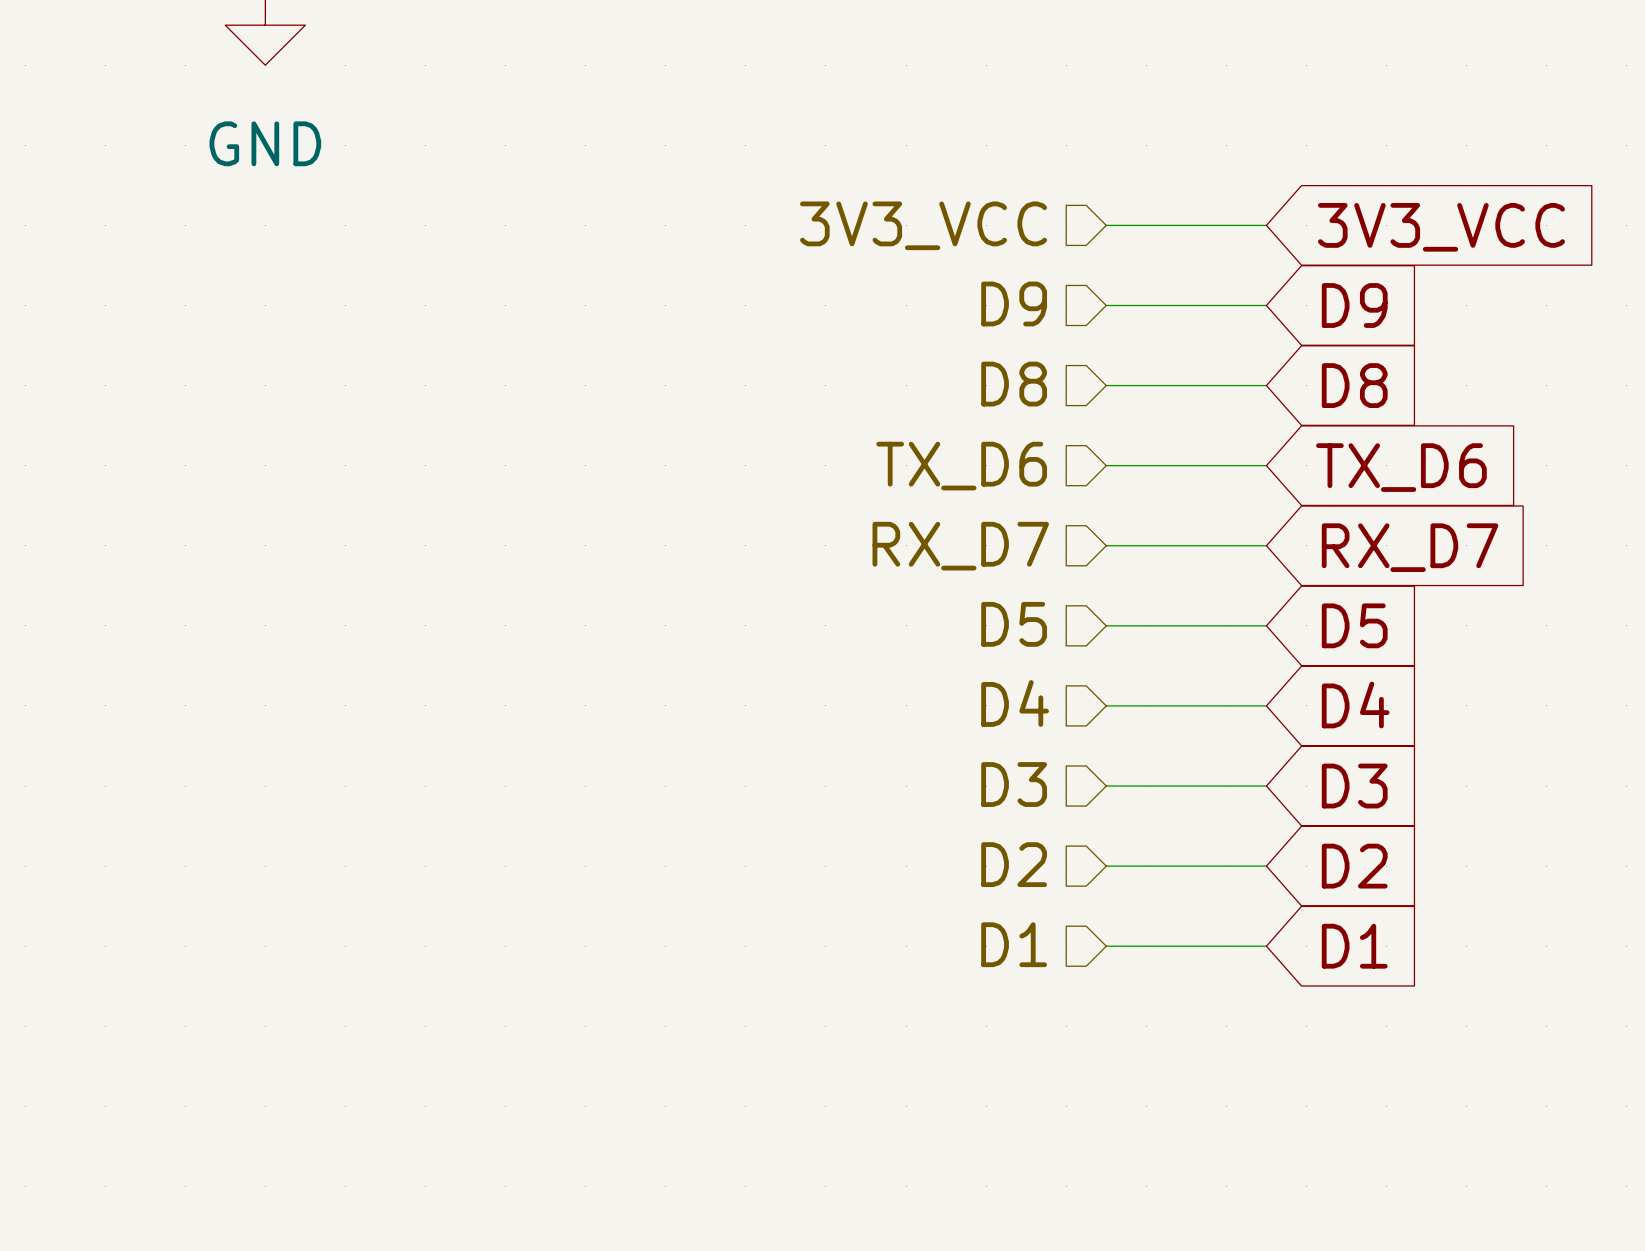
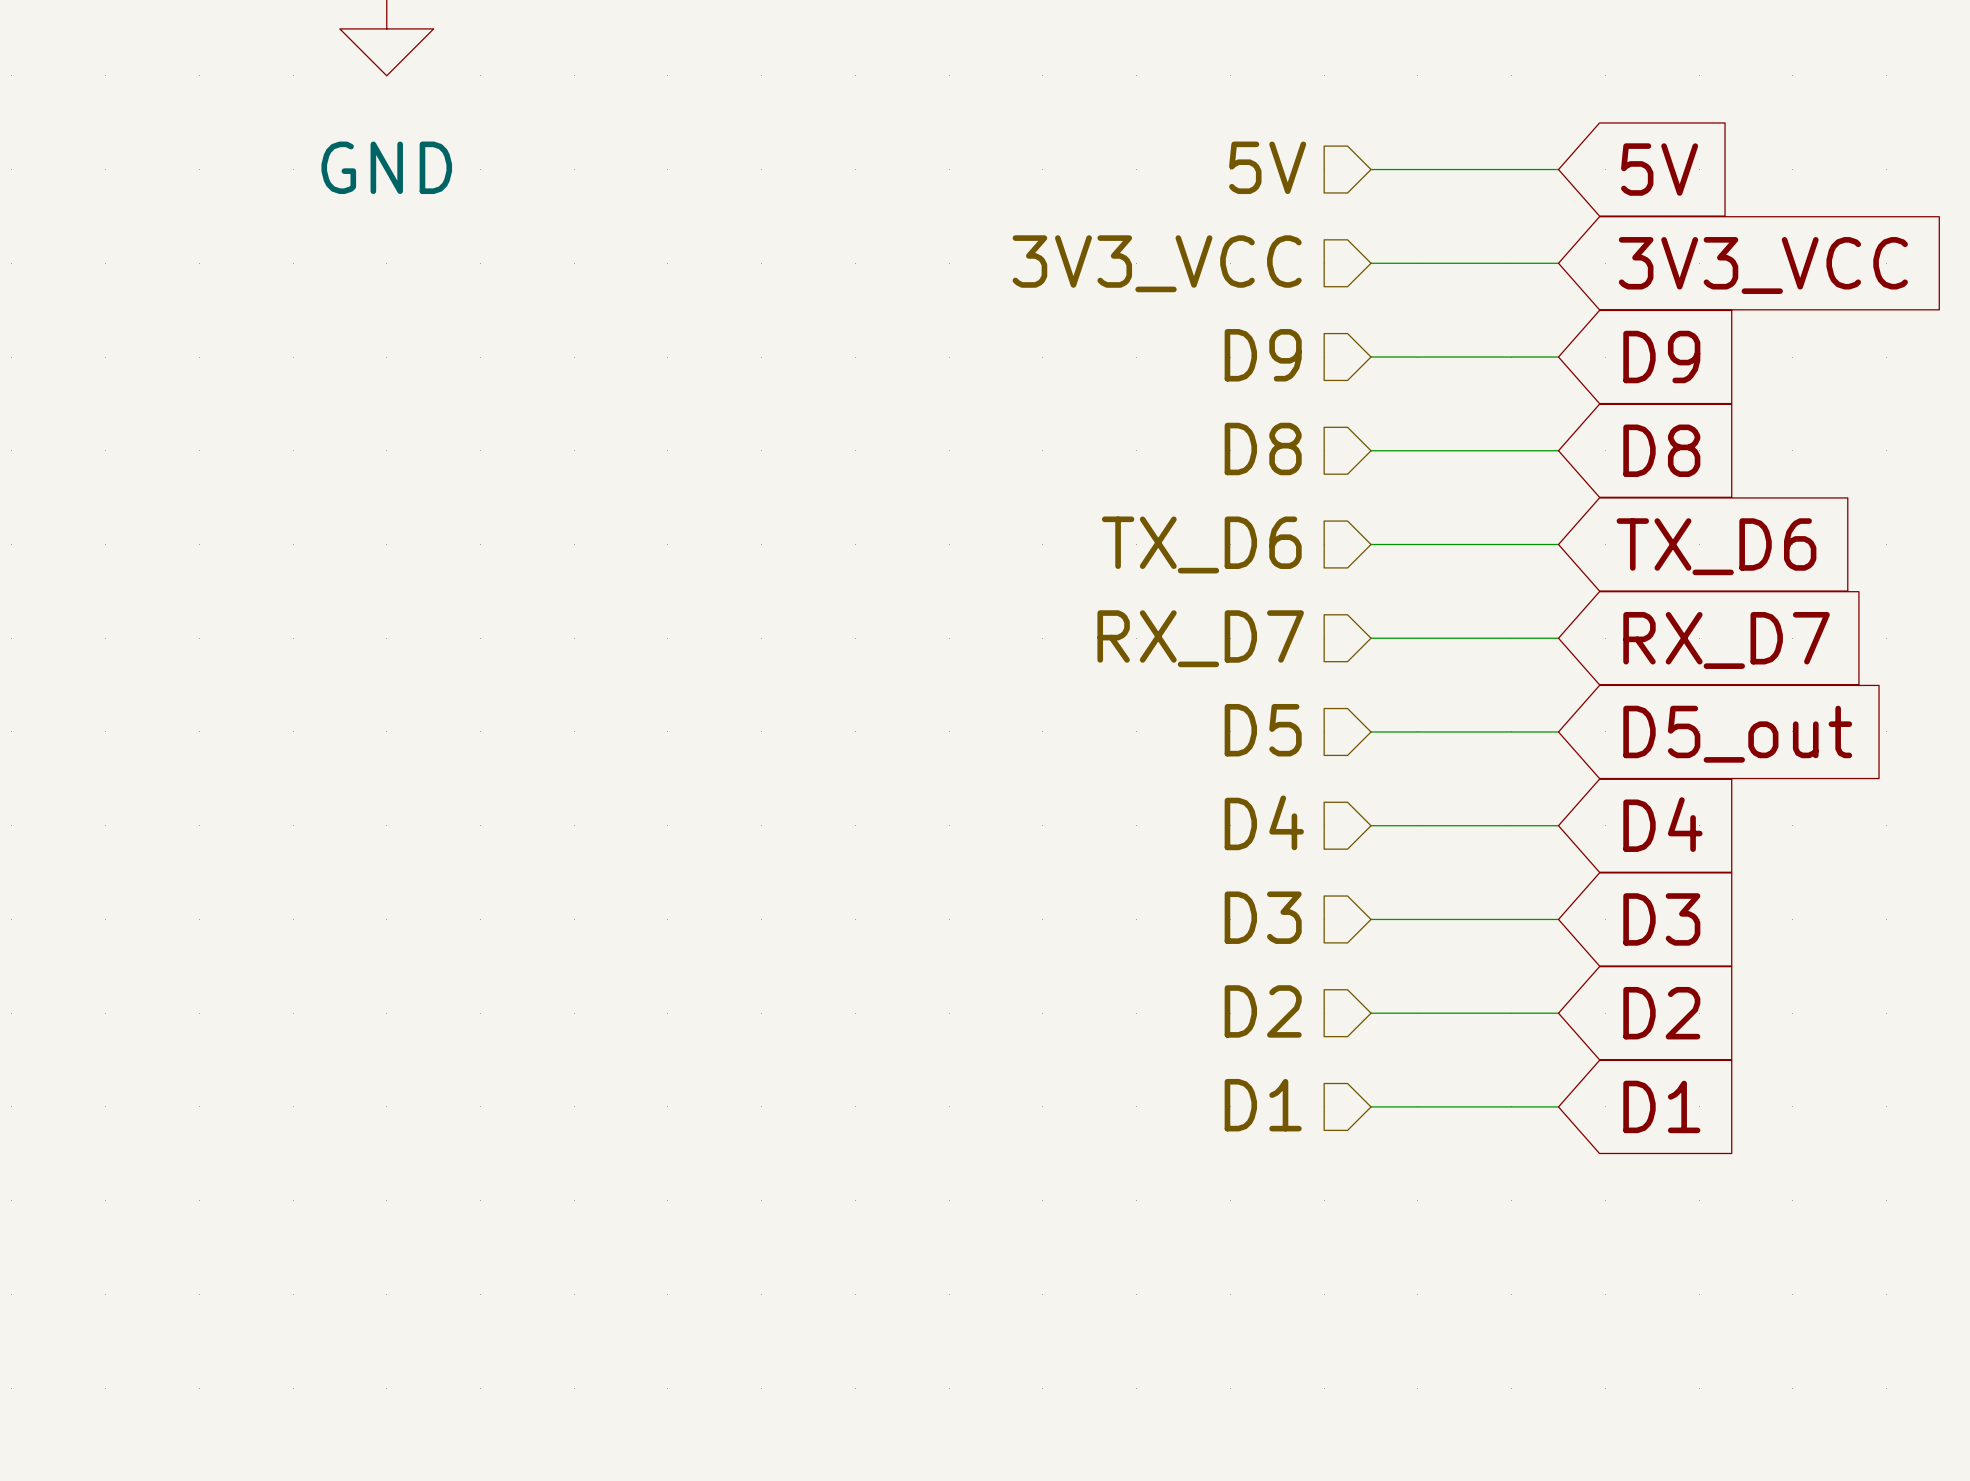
hierarchical label: none -> 5V (1267, 167)
wire: none -> (1371, 169) (1558, 169)
global label: none -> 5V (1659, 169)
global label: D5 (1354, 625) -> D5_out (1737, 734)

